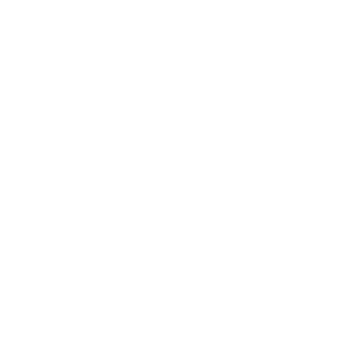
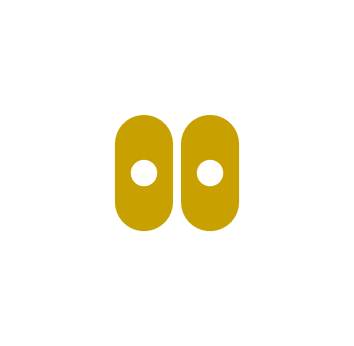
part: none -> (177, 173)

